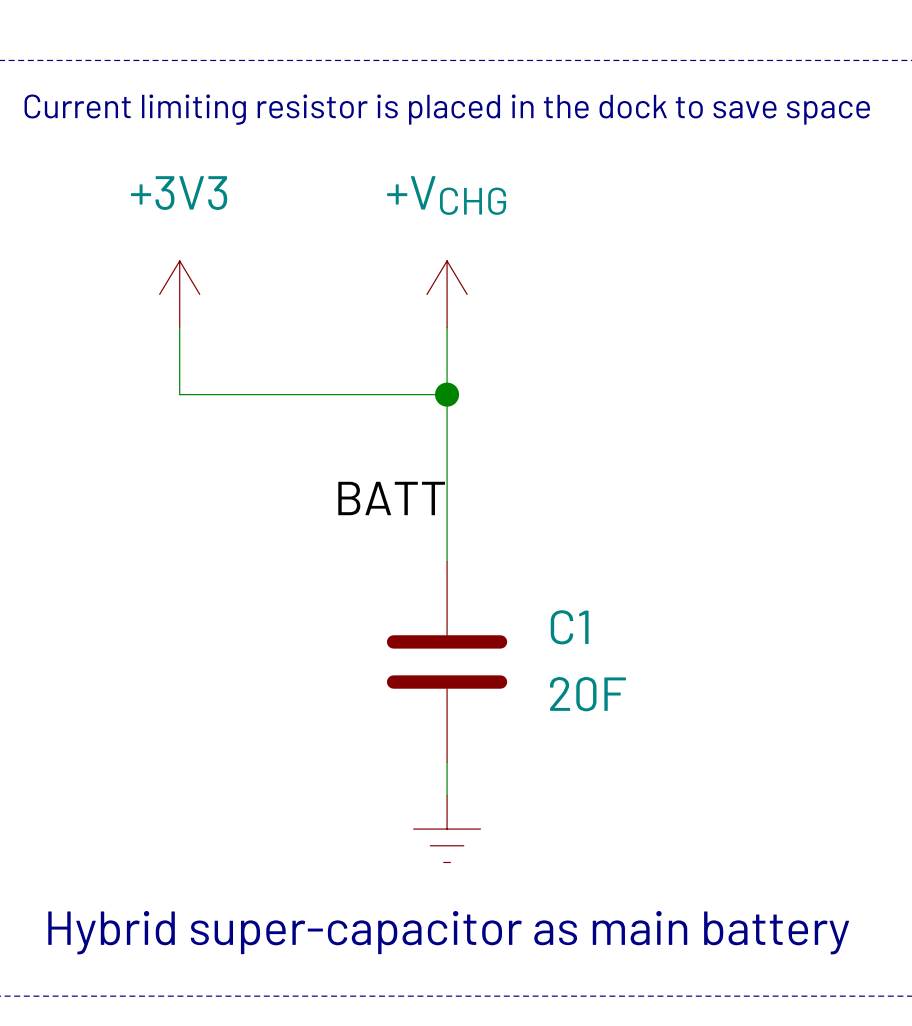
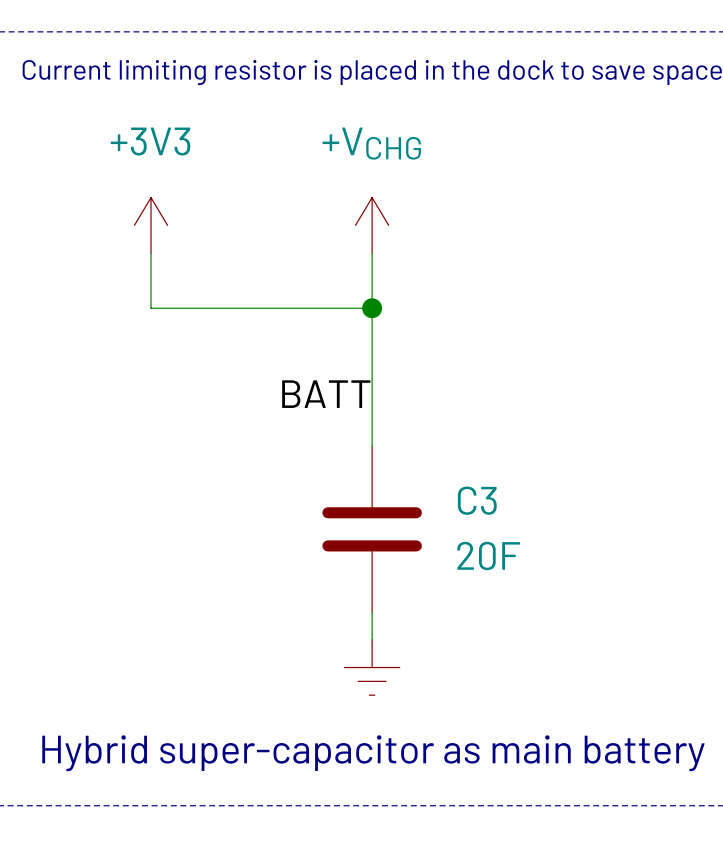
C1 name: C1 (569, 627) -> C3 (477, 500)

